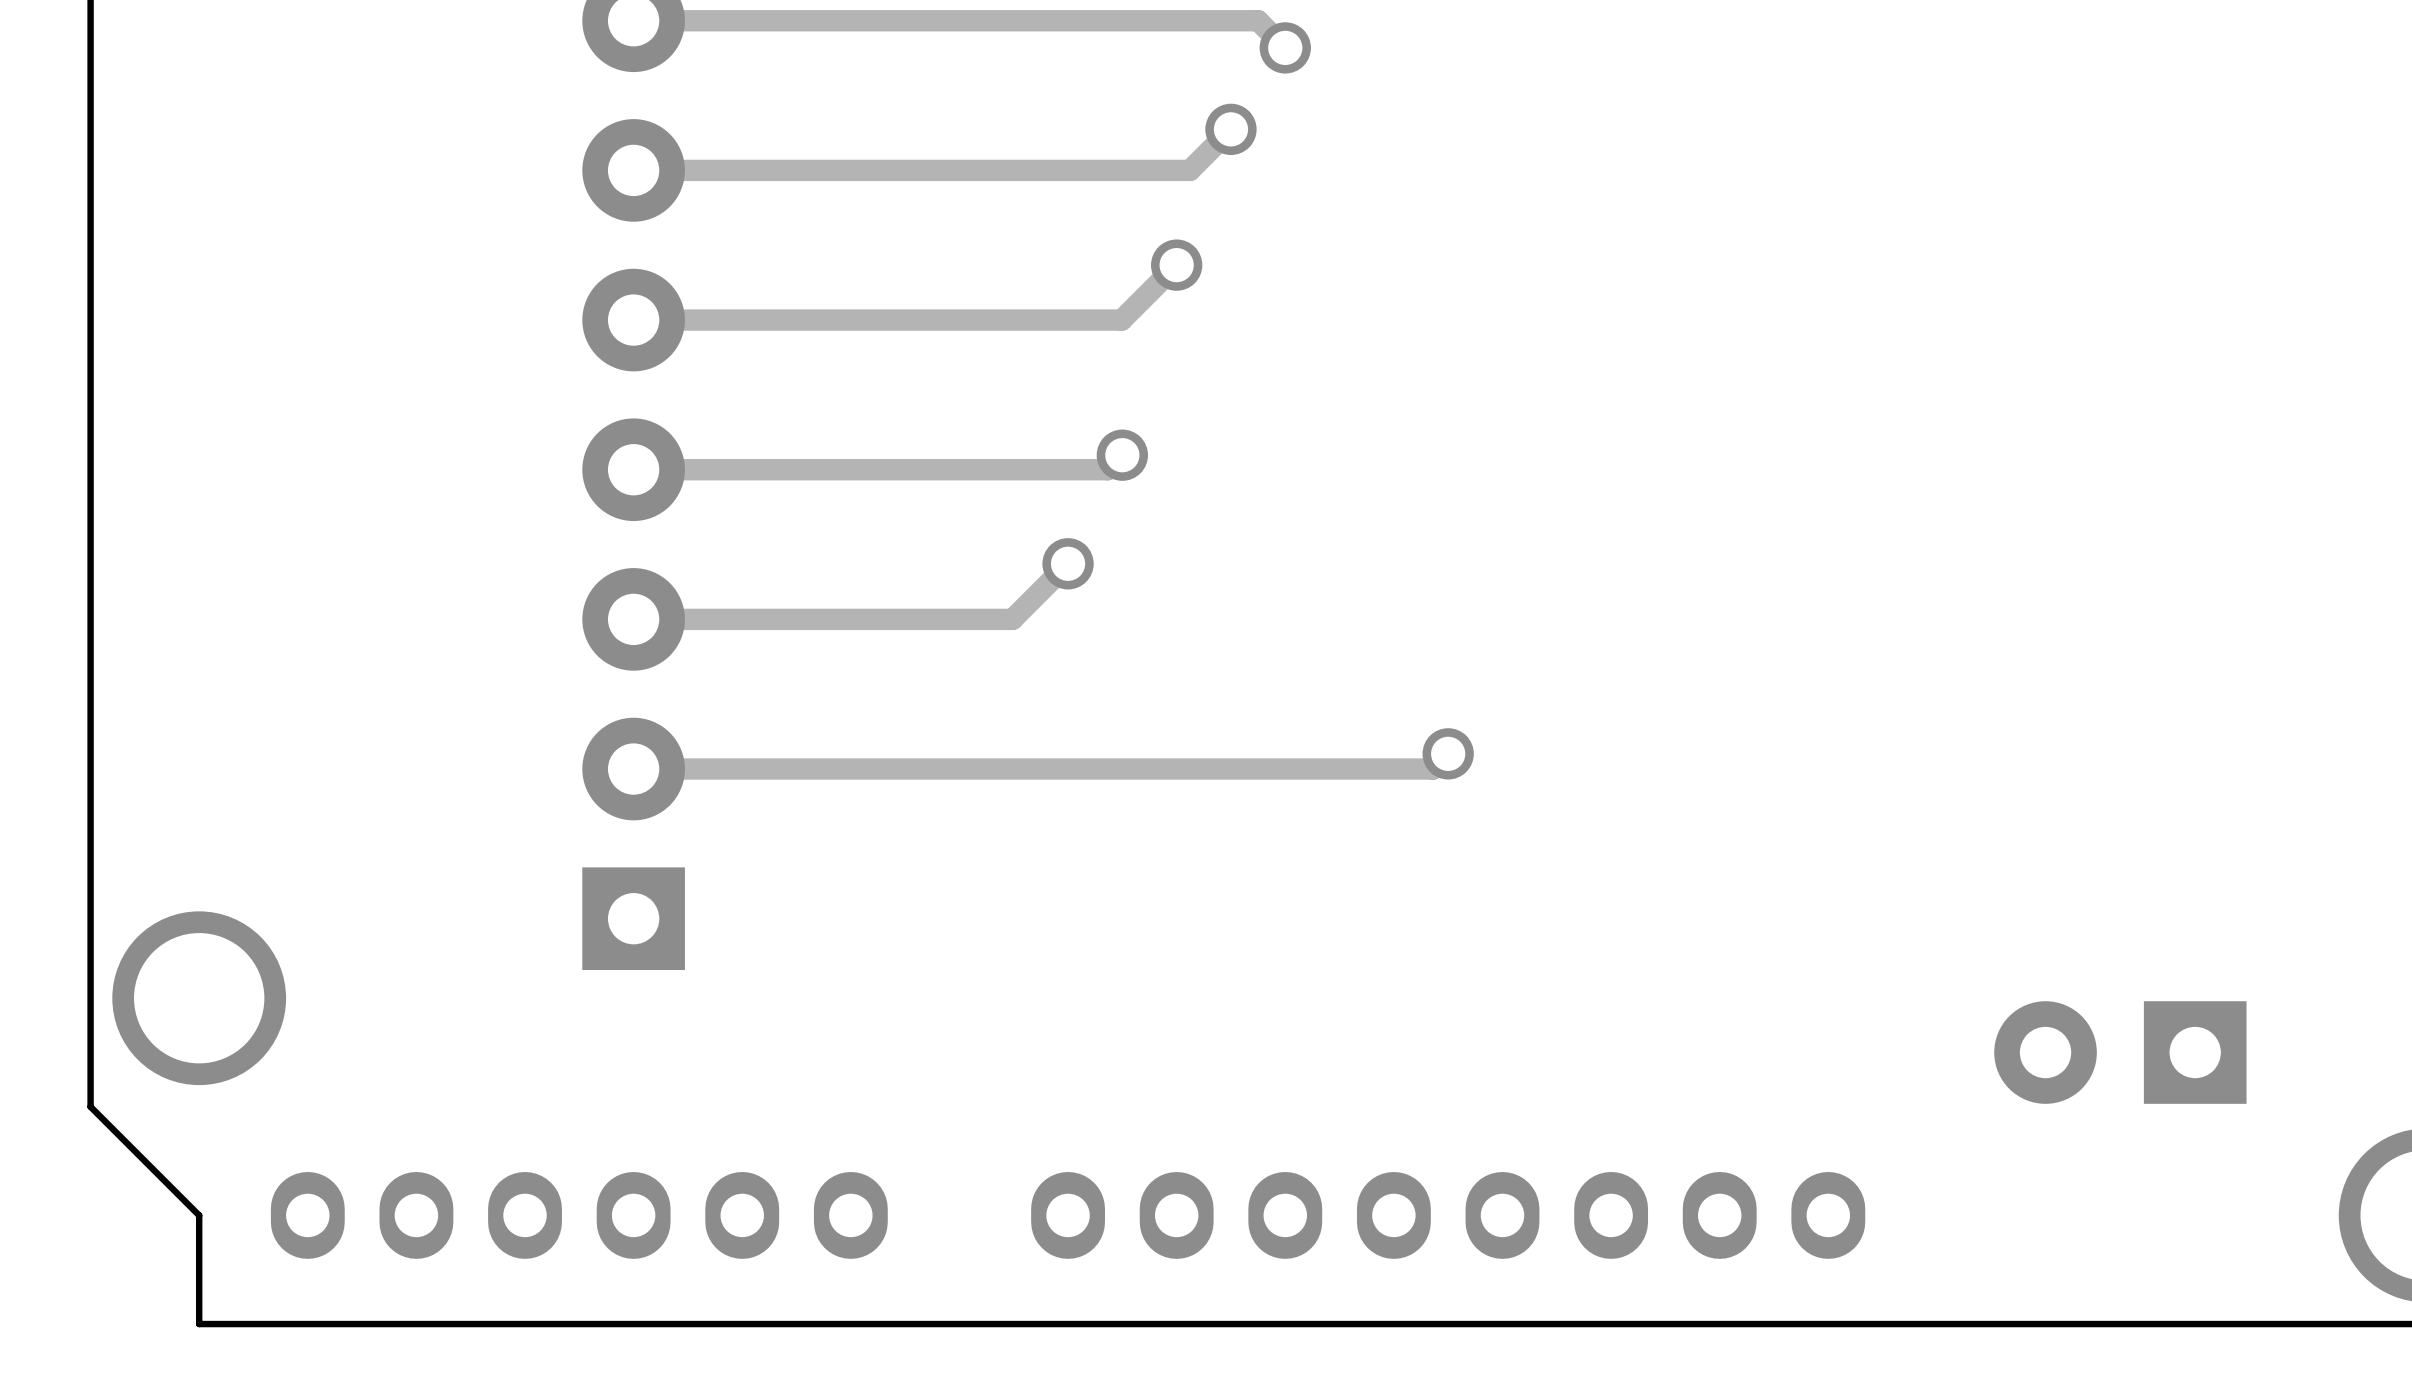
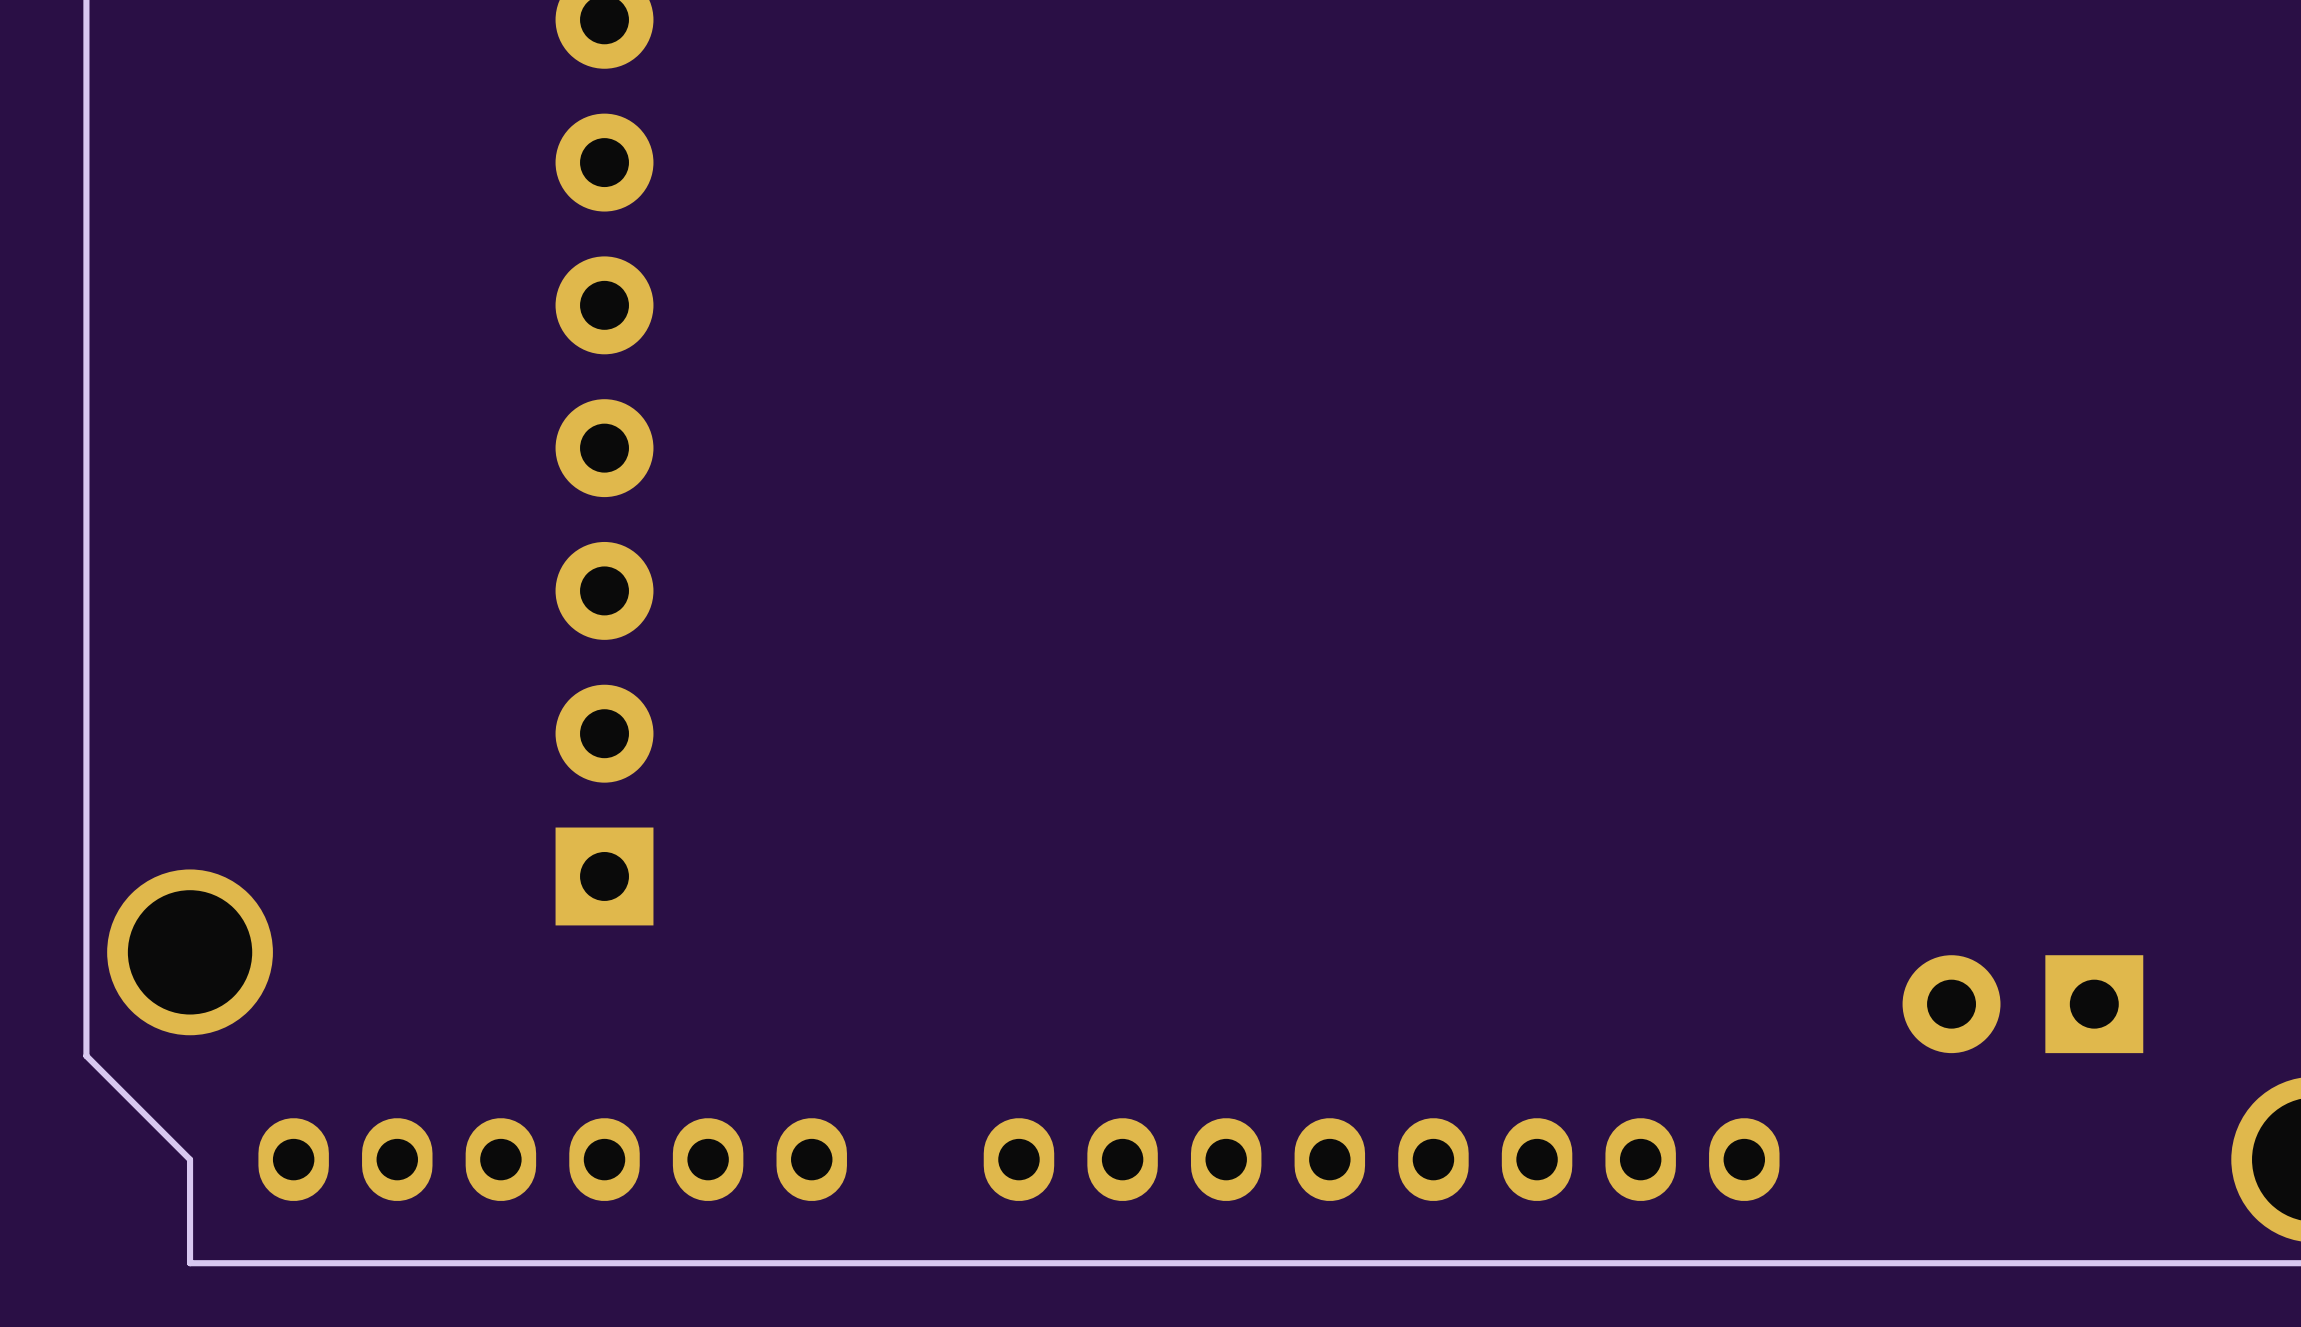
track: (633, 20) (1258, 20) (1285, 47) -> none
via: (1285, 47) -> none
track: (1230, 129) (1189, 170) (633, 170) -> none
via: (1230, 129) -> none
track: (1176, 265) (1121, 320) (633, 320) -> none
via: (1176, 265) -> none
track: (1122, 455) (1107, 469) (633, 469) -> none
via: (1122, 455) -> none
track: (1068, 563) (1012, 619) (633, 619) -> none
via: (1068, 563) -> none
track: (1448, 753) (1433, 769) (633, 769) -> none
via: (1448, 753) -> none

